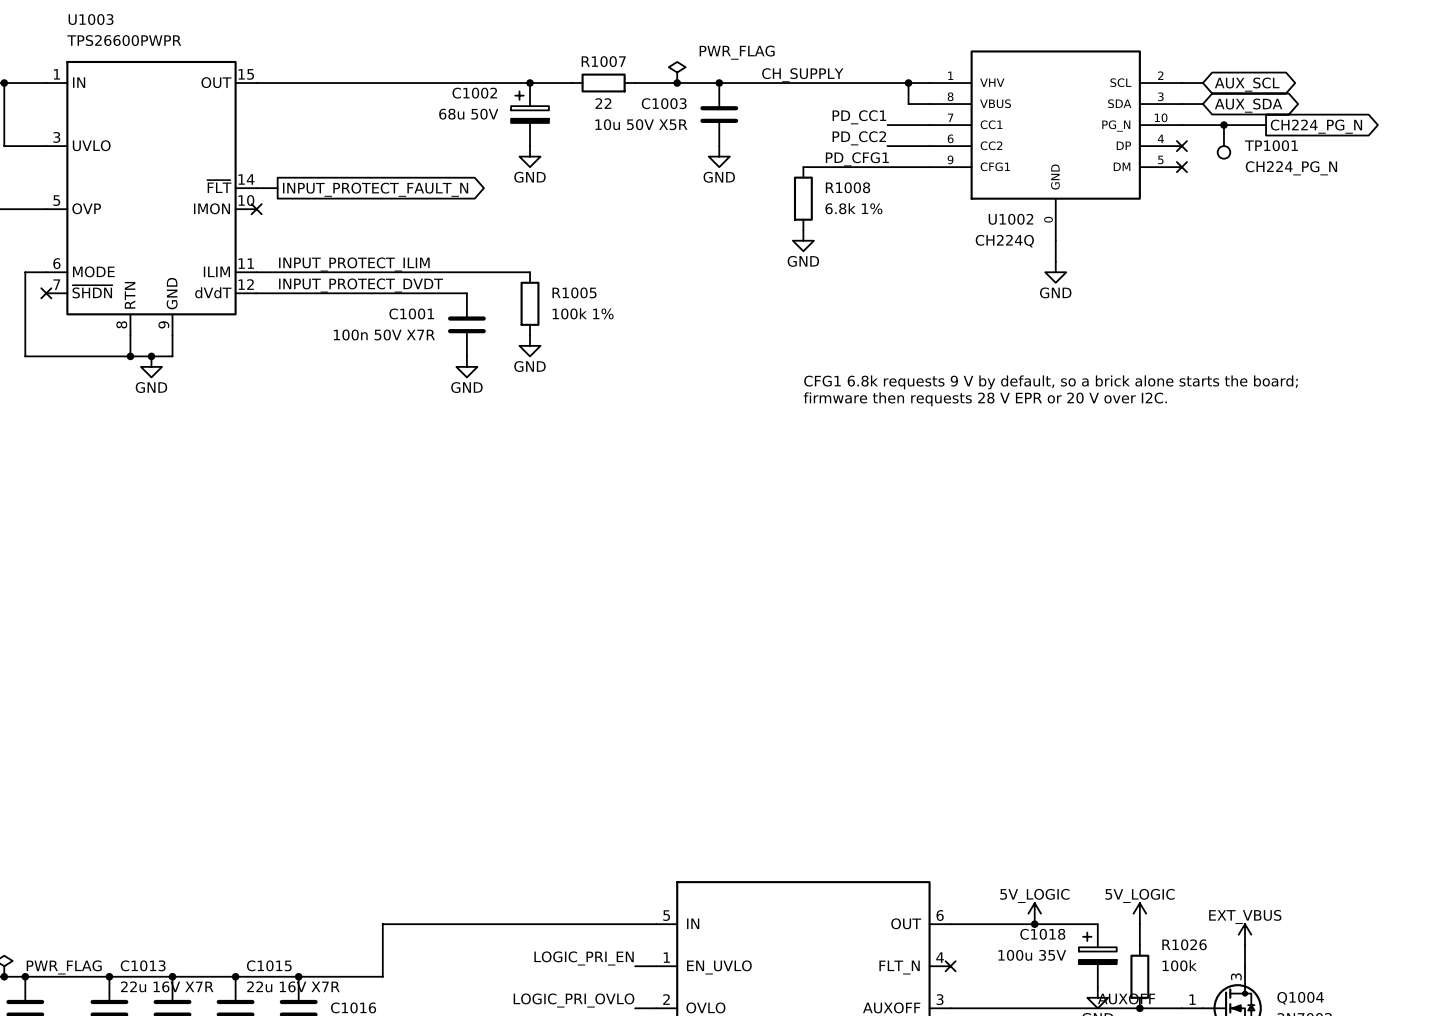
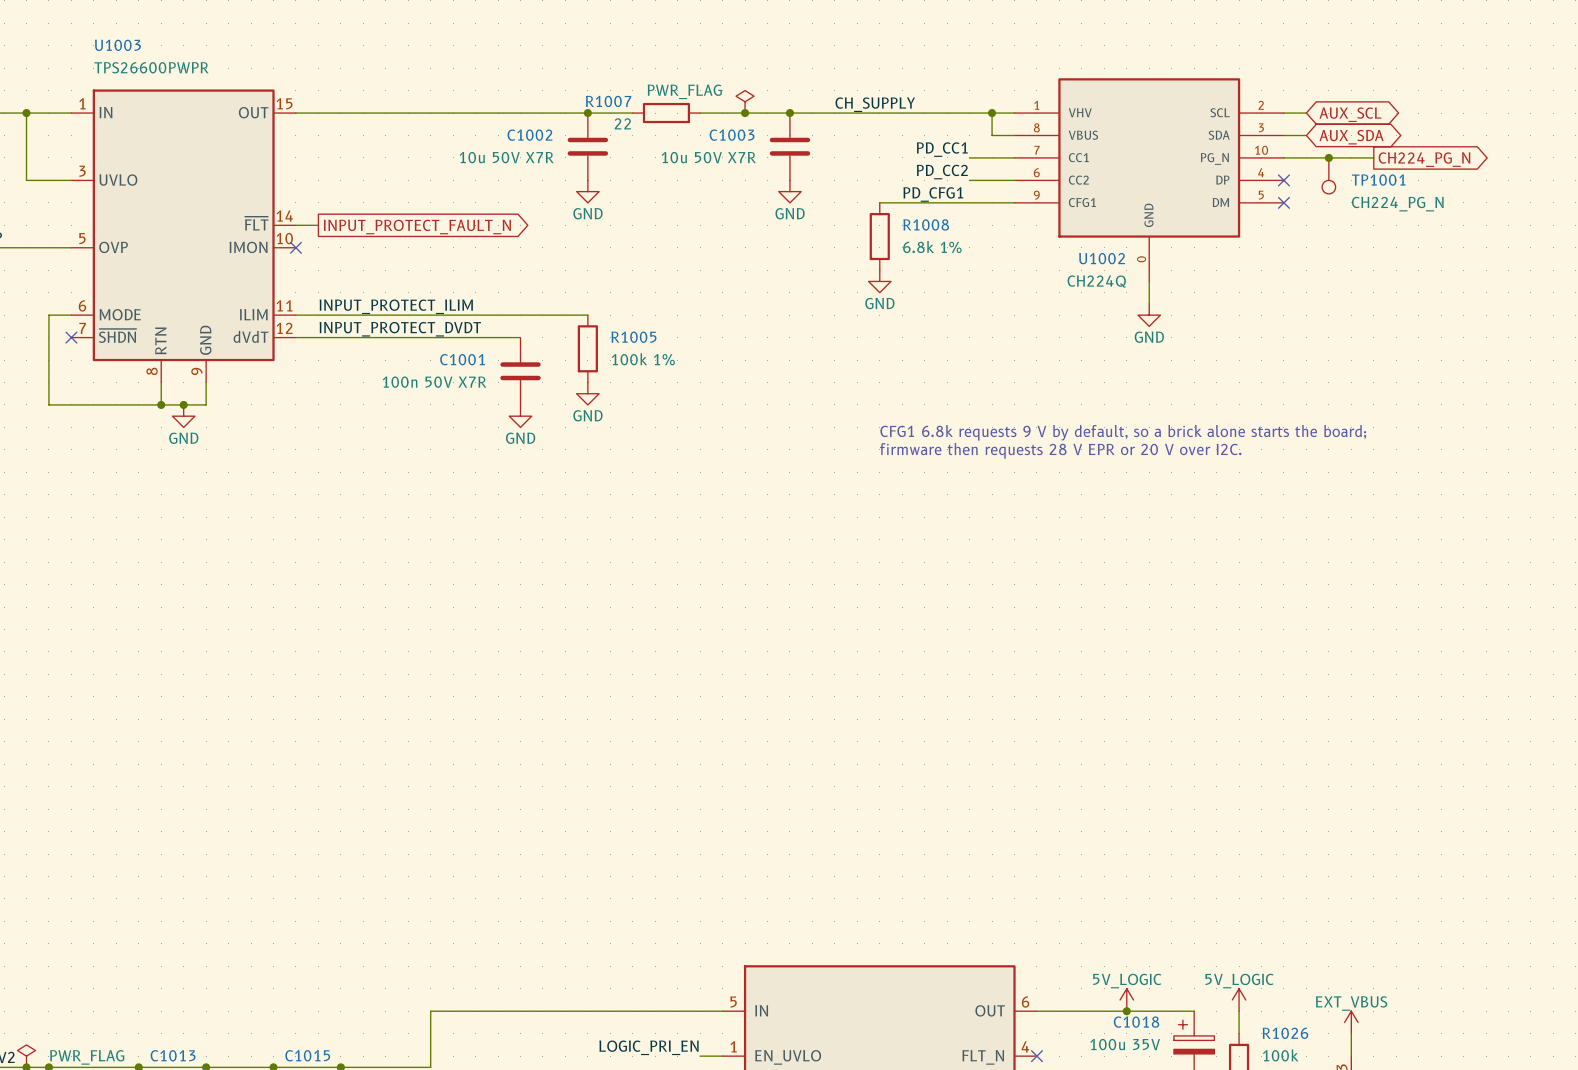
power symbol text position: PWR_FLAG (737, 52) -> PWR_FLAG (684, 91)
R1007 name position: R1007 (603, 61) -> R1007 (608, 101)
C1002 symbol: [511, 83, 549, 147] -> [567, 113, 609, 181]
R1007 value position: 22 (603, 103) -> 22 (622, 123)
C1002 value: 68u 50V (468, 114) -> 10u 50V X7R (506, 157)
C1003 value: 10u 50V X5R (641, 124) -> 10u 50V X7R (708, 157)

